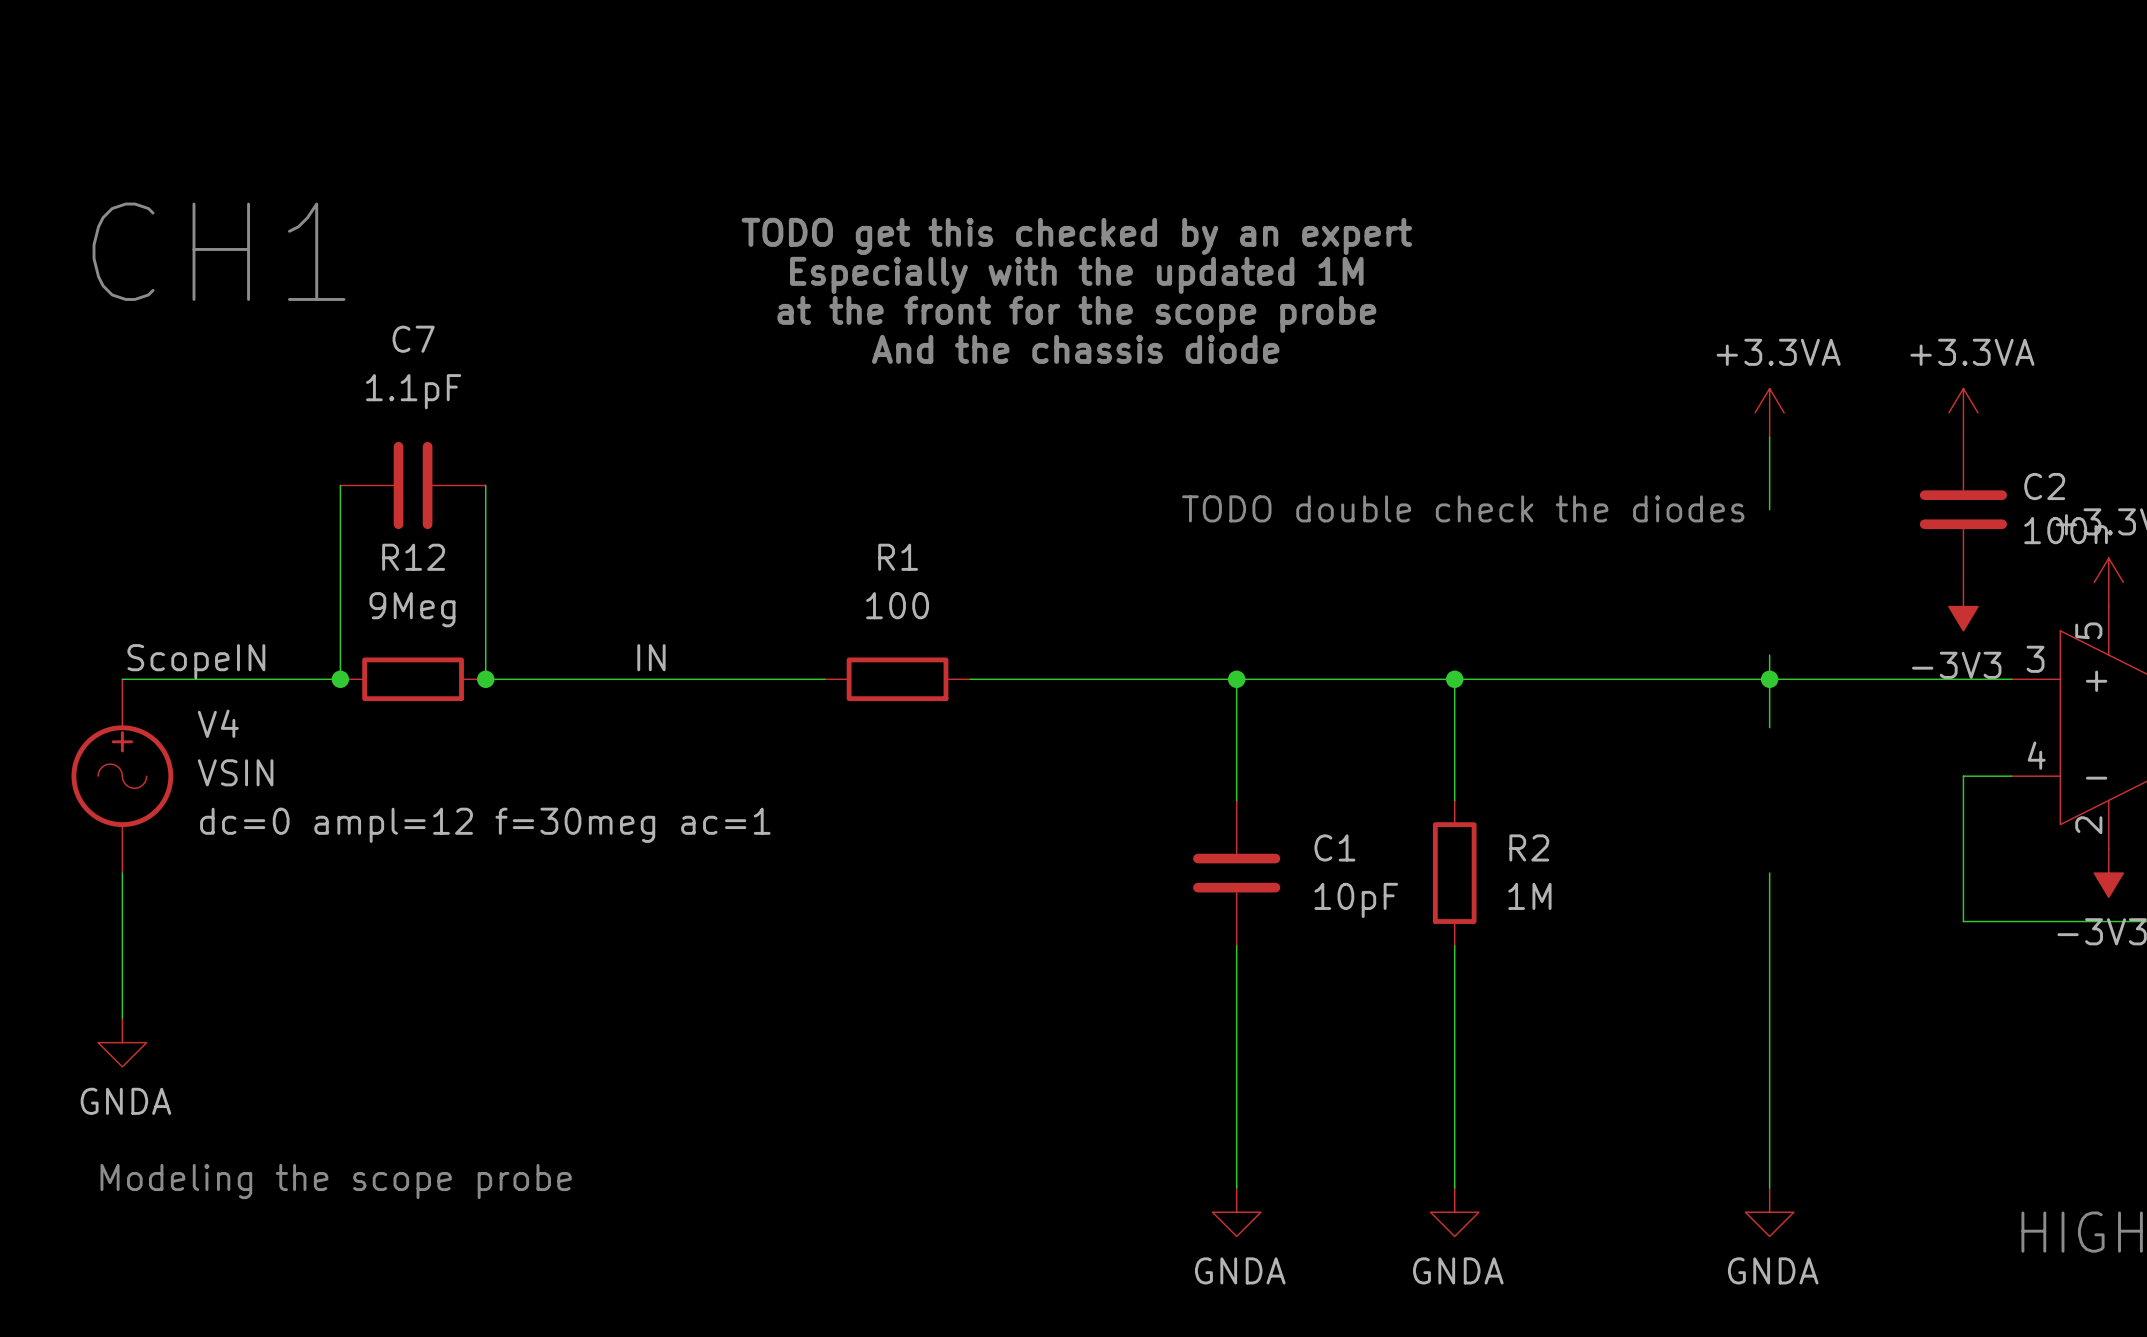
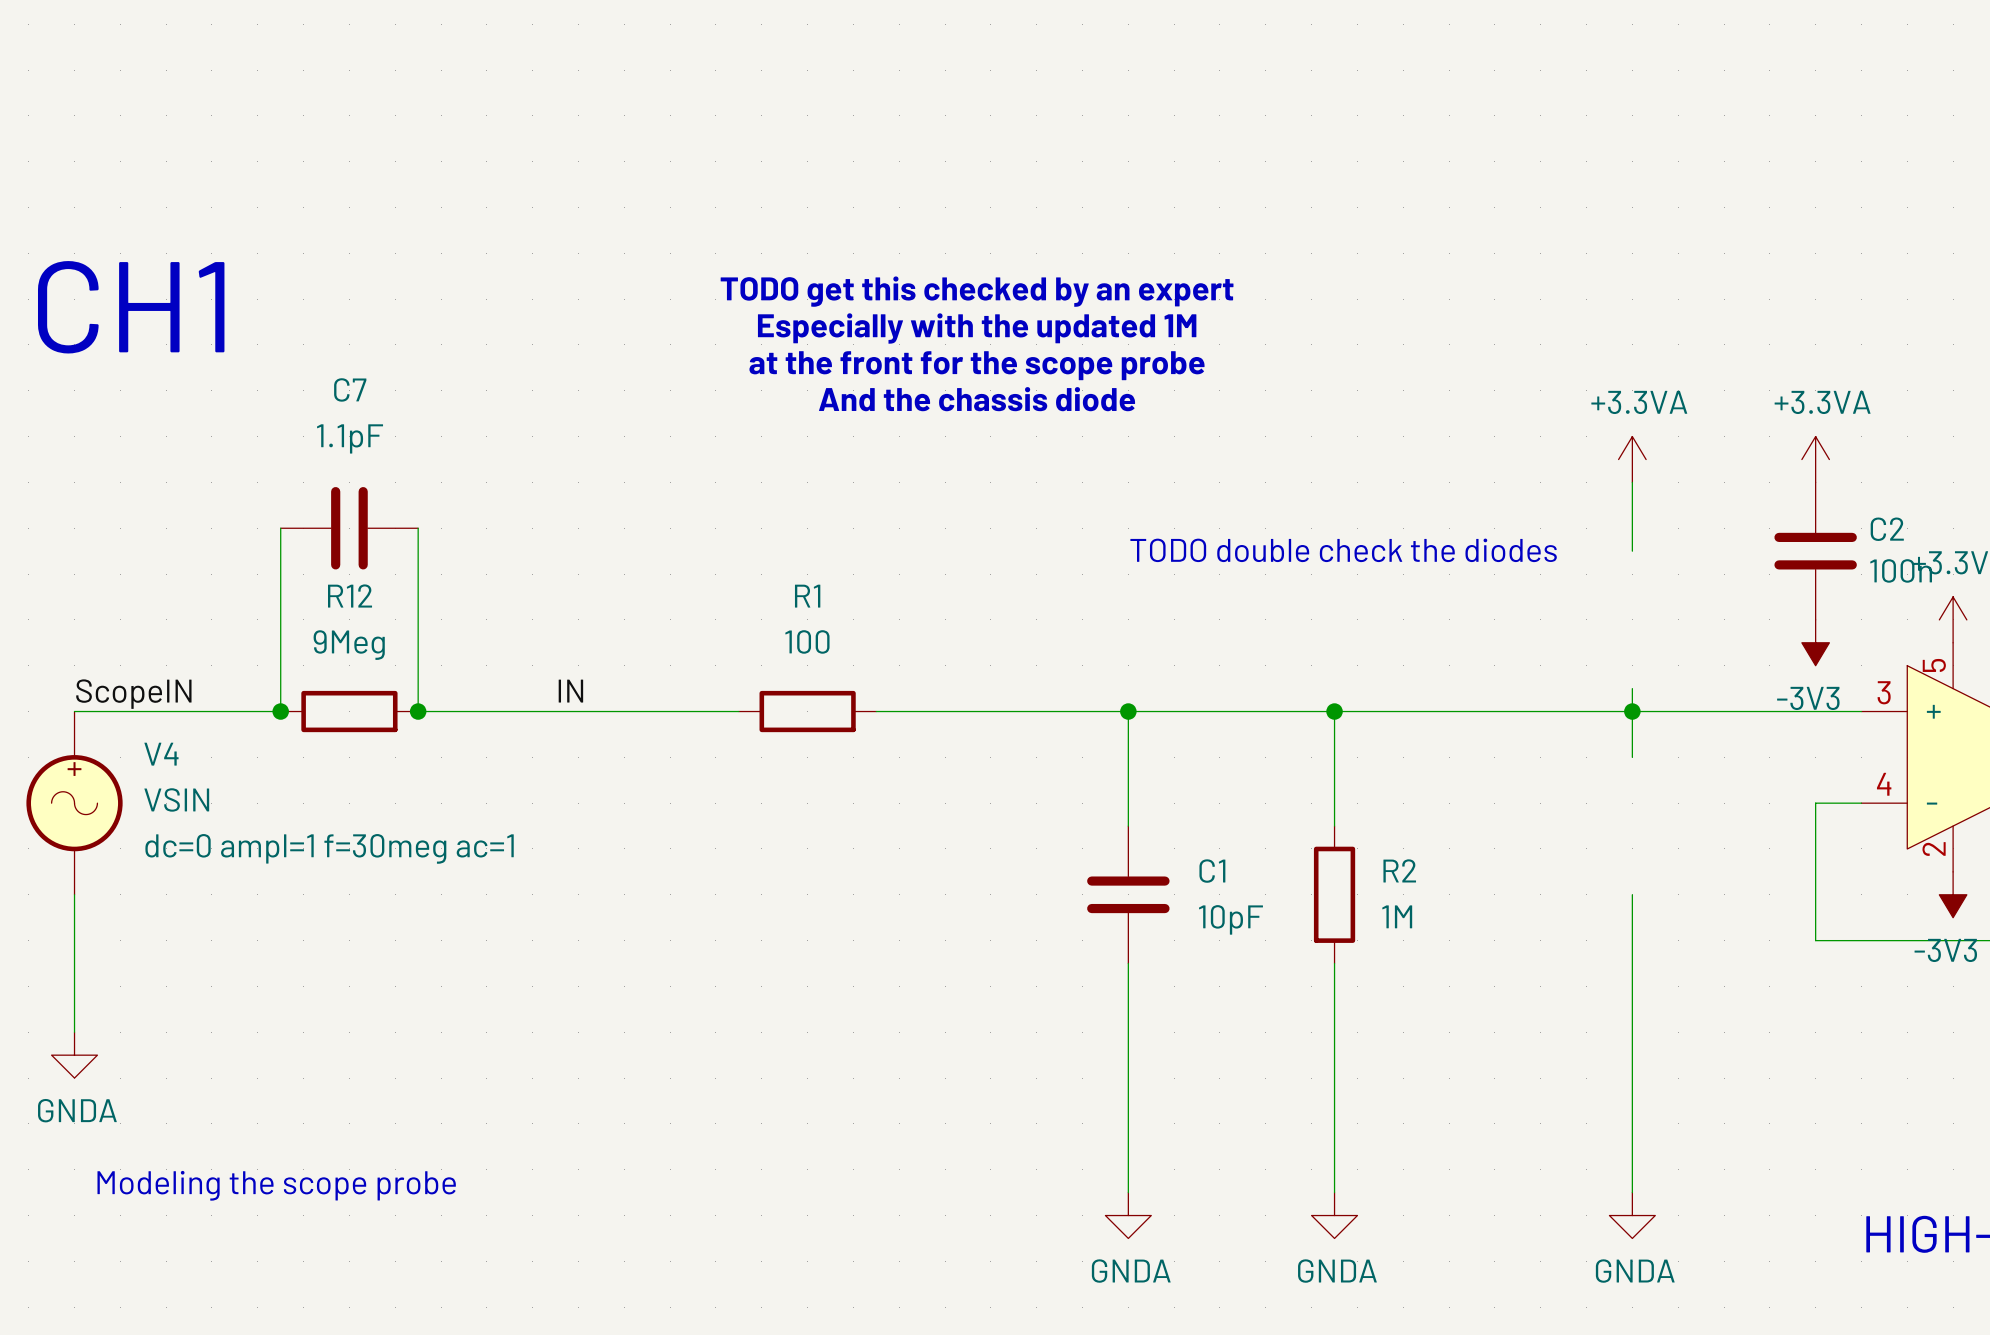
V4 text: dc=0 ampl=12 f=30meg ac=1 (485, 825) -> dc=0 ampl=1 f=30meg ac=1 (329, 848)

